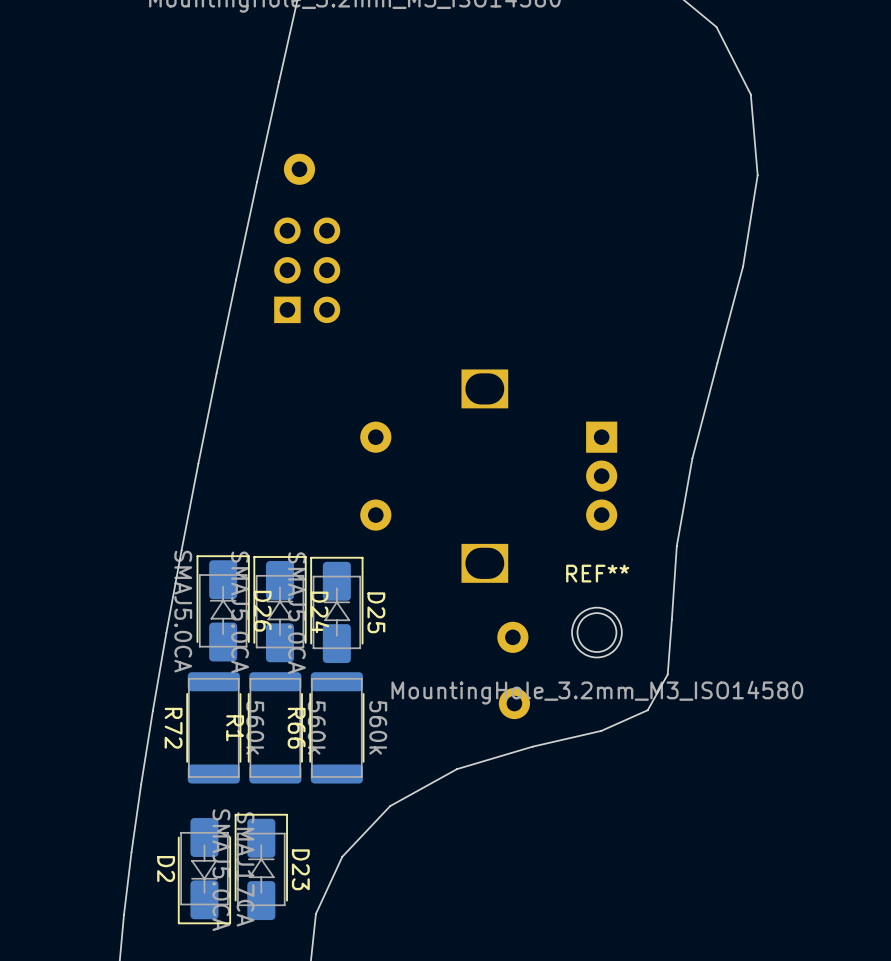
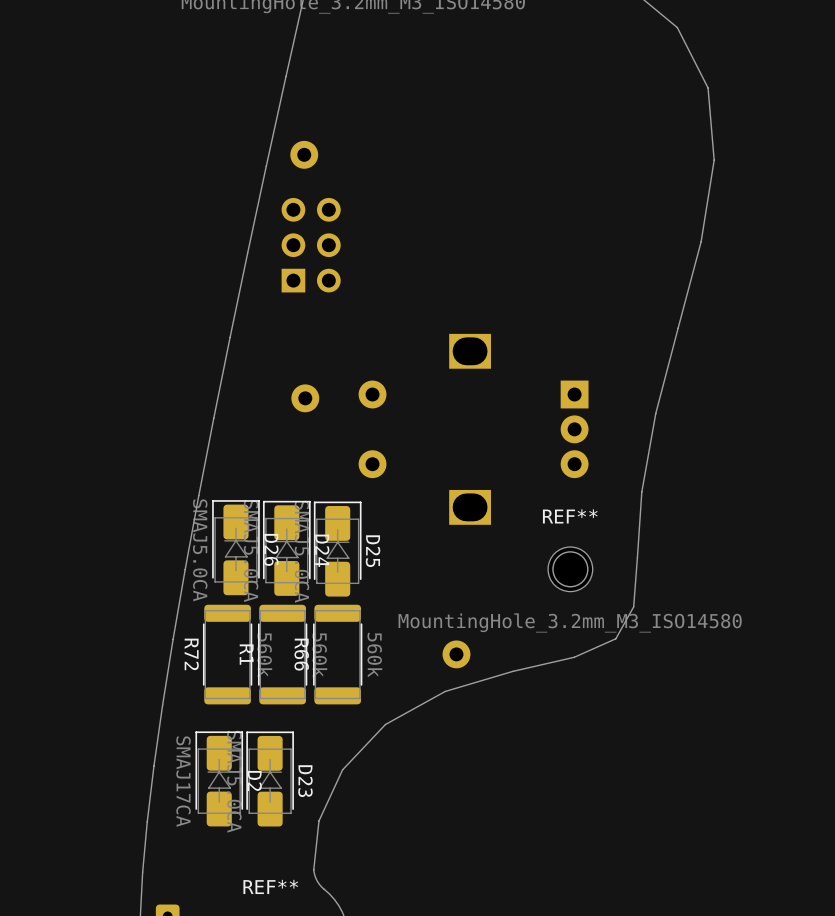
part: none -> (305, 398)
part: (512, 637) -> none
part: (514, 703) -> none
part: none -> (456, 654)
D2 rotation: 0° (204, 871) -> 180° (219, 778)

